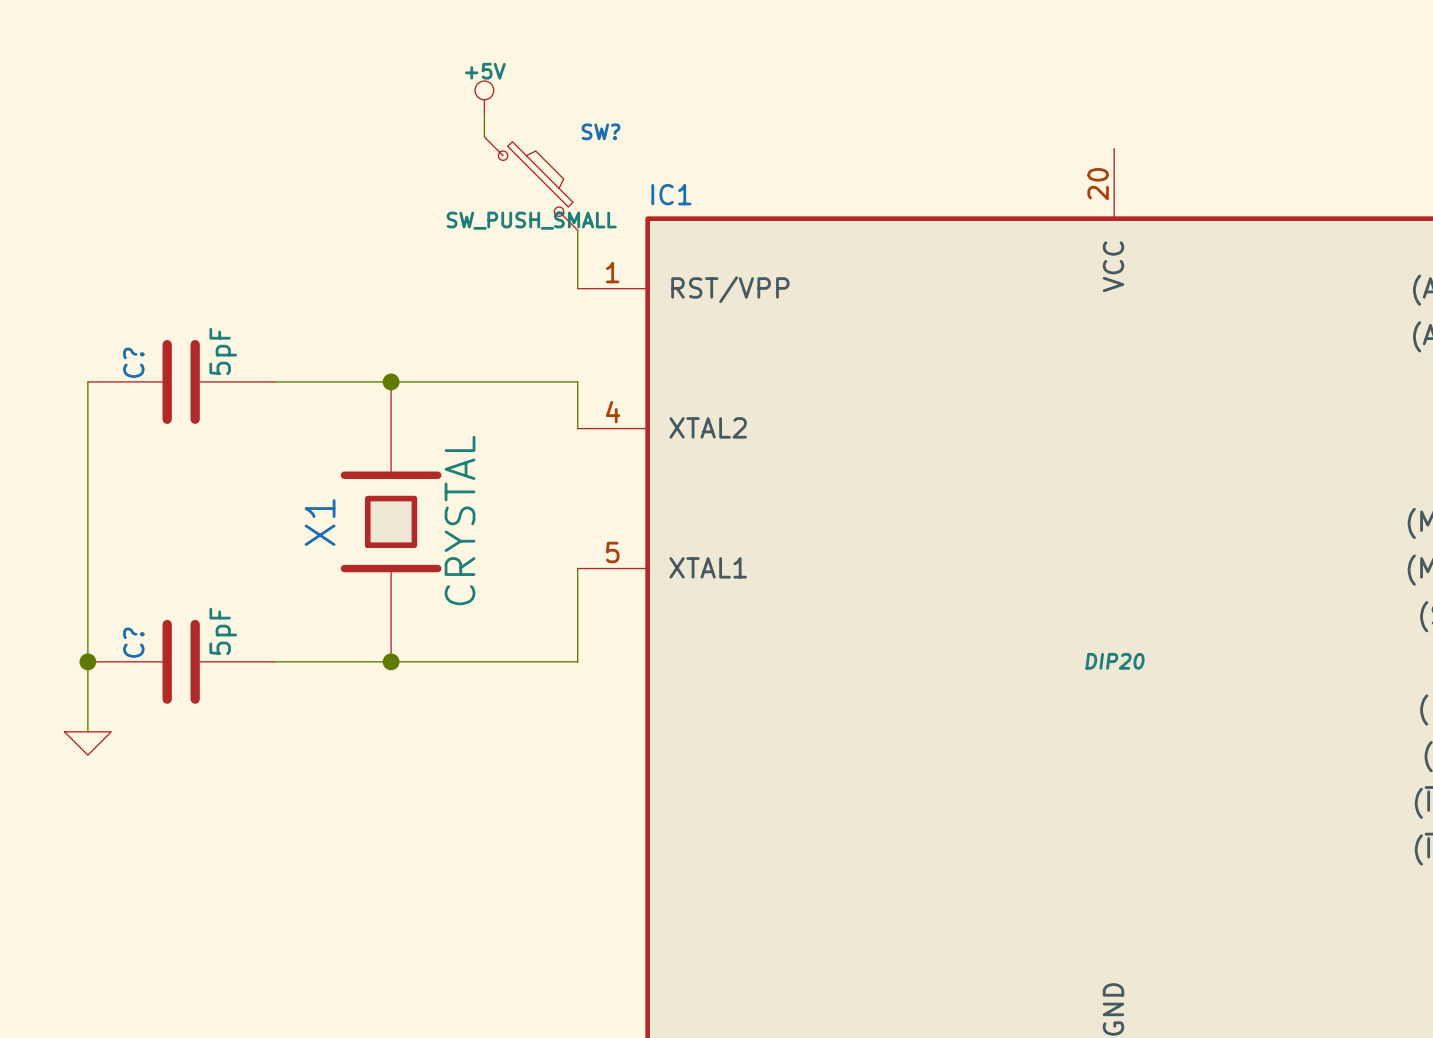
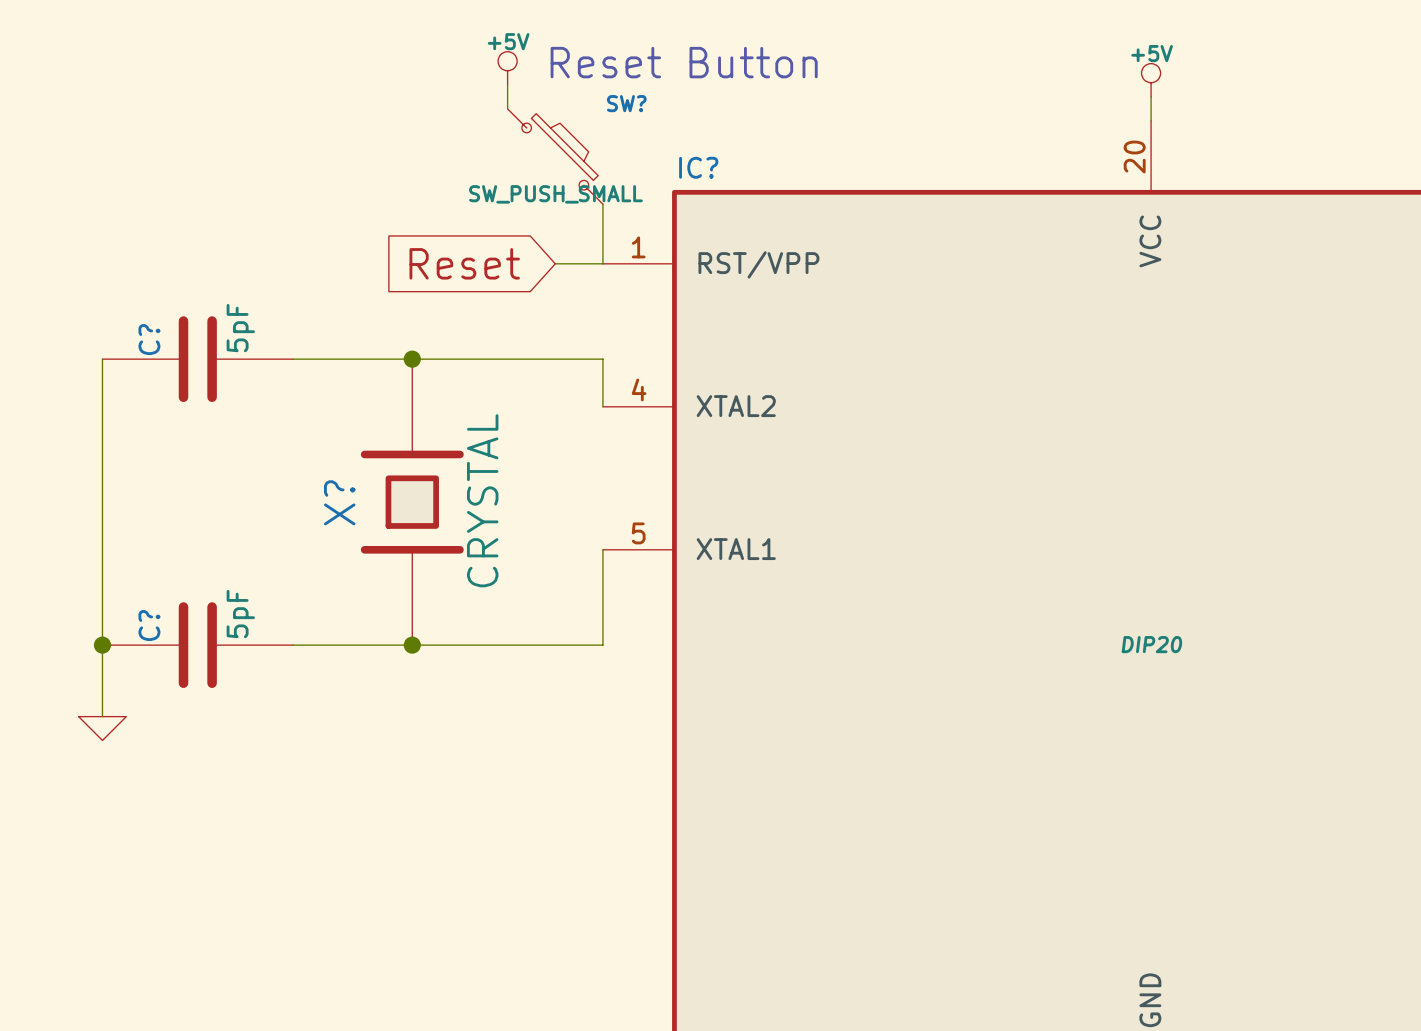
text: none -> Reset Button (684, 62)
power symbol: none -> +5V (1151, 80)
wire: none -> (1151, 97) (1151, 120)
IC1 name: IC1 (671, 194) -> IC? (698, 167)
global label: none -> Reset (464, 263)
wire: none -> (555, 263) (602, 263)
X1 name: X1 (320, 522) -> X? (339, 502)

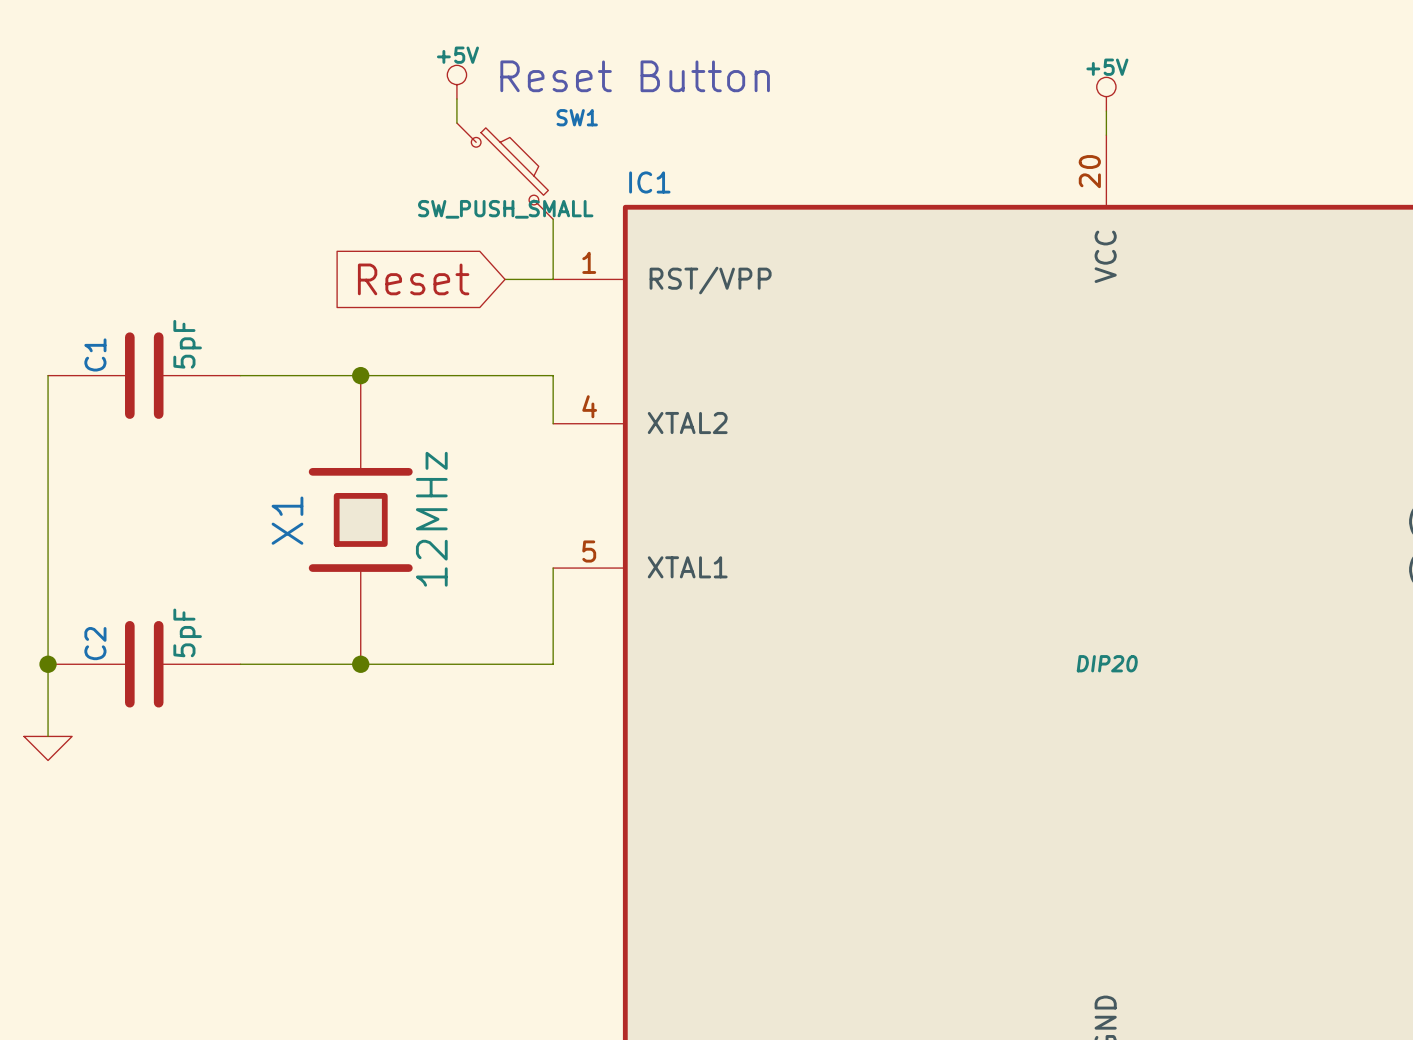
SW? name: SW? (626, 103) -> SW1 (577, 117)
IC? name: IC? (698, 167) -> IC1 (649, 182)
C? name: C? (149, 339) -> C1 (95, 354)
X? value: CRYSTAL (482, 500) -> 12MHz (431, 519)
X? name: X? (339, 502) -> X1 (287, 520)
C? name: C? (149, 625) -> C2 (95, 643)

